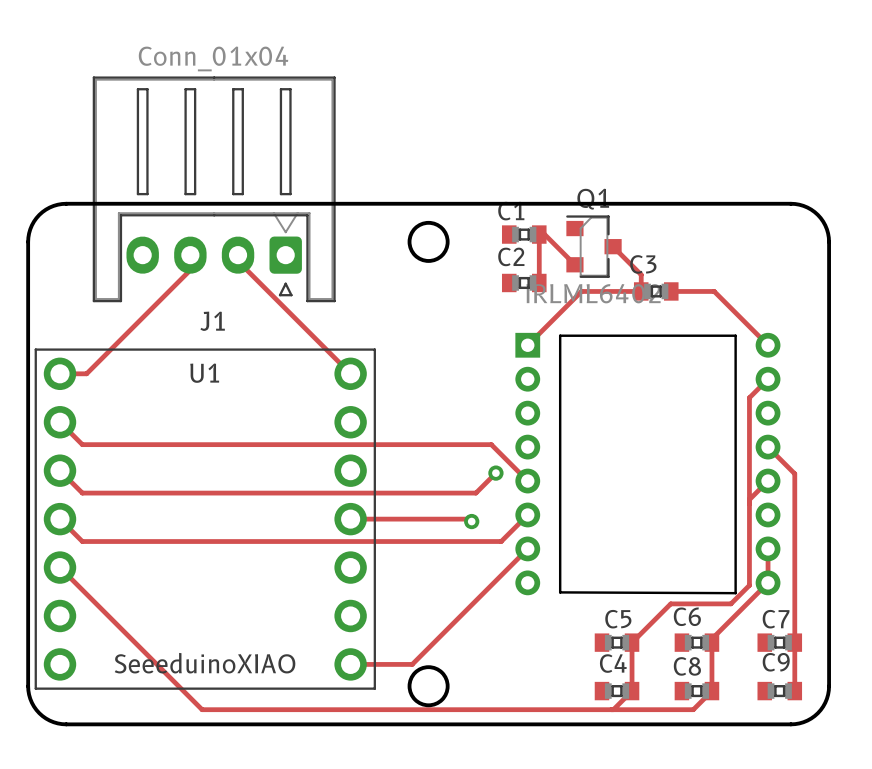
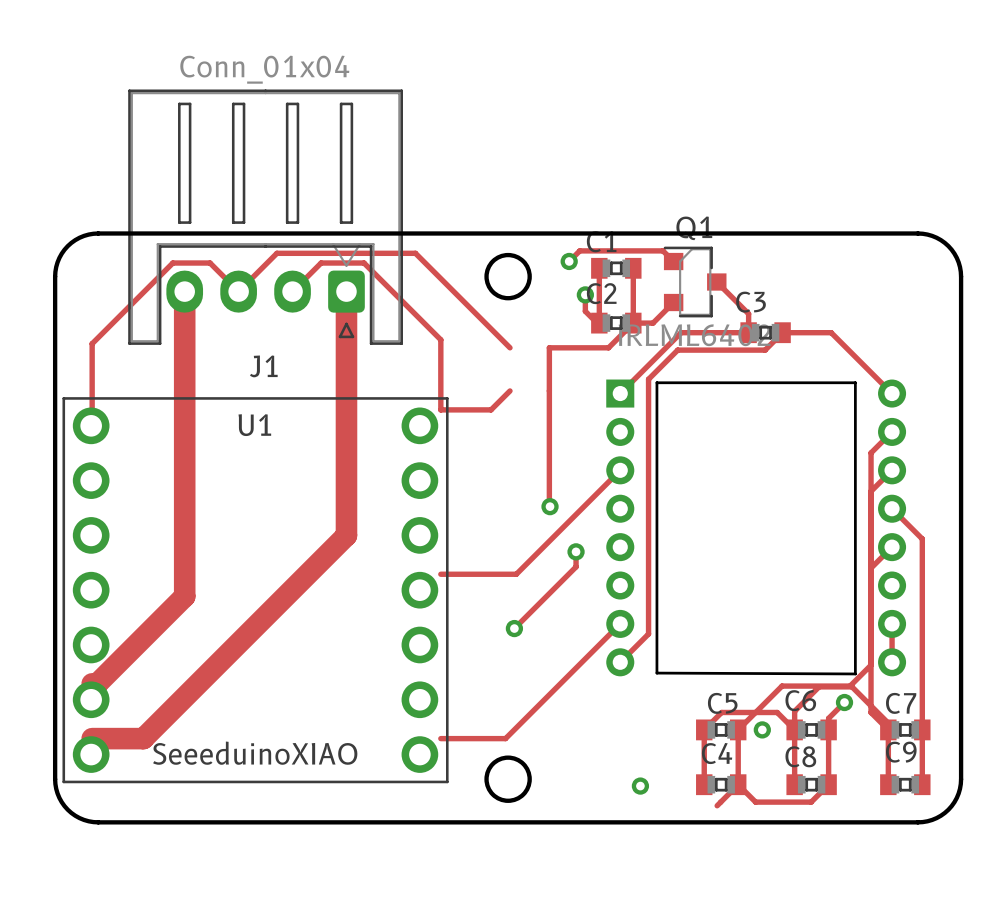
track: none -> (569, 261) (579, 250) (663, 250) (673, 261)
via: none -> (569, 261)
track: none -> (599, 268) (599, 323) (585, 311) (585, 294)
track: (539, 234) (544, 234) (574, 264) -> (550, 506) (549, 347) (608, 347) (633, 323) (653, 323) (673, 302)
track: none -> (184, 291) (184, 596) (97, 683) (92, 683)
track: (190, 255) (190, 270) (86, 373) (59, 373) -> none
track: (238, 255) (238, 261) (350, 373) -> (292, 291) (321, 263) (364, 263) (440, 339) (440, 409) (491, 409) (509, 390)
track: none -> (346, 291) (346, 535) (143, 738) (92, 738)
via: none -> (585, 294)
track: none -> (782, 332) (765, 350) (677, 350) (648, 379) (648, 634) (620, 662)
track: none -> (509, 347) (415, 253) (276, 253) (238, 291) (210, 263) (172, 263) (92, 343) (92, 409)
track: none -> (620, 470) (516, 574) (440, 574)
track: none -> (892, 470) (871, 491) (871, 712) (888, 729)
track: (59, 422) (82, 444) (491, 444) (527, 481) -> none
via: none -> (550, 506)
track: (59, 470) (82, 493) (475, 493) (495, 473) -> none
via position: (495, 473) -> (576, 551)
track: none -> (576, 551) (576, 566) (514, 628)
track: (527, 514) (501, 541) (82, 541) (59, 519) -> none
track: (350, 519) (469, 519) (471, 521) -> none
via: (471, 521) -> none
via: none -> (514, 628)
track: (59, 567) (202, 709) (693, 709) (696, 706) -> (738, 784) (755, 802) (811, 802)
track: (768, 582) (711, 638) -> (844, 702) (828, 718) (828, 725)
via: none -> (844, 702)
via: none -> (762, 729)
track: none -> (794, 729) (777, 712) (721, 712) (704, 729) (704, 784)
track: (426, 650) (412, 664) (350, 664) -> (505, 738) (440, 738)
track: none -> (794, 784) (794, 711) (819, 686) (852, 686) (888, 723) (888, 784)
via: none -> (640, 786)

